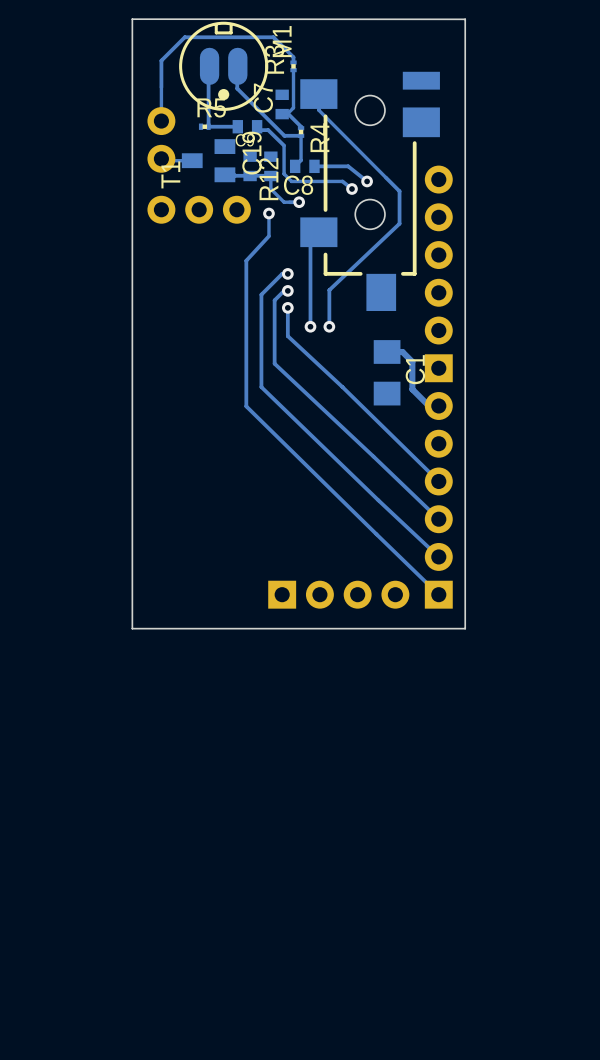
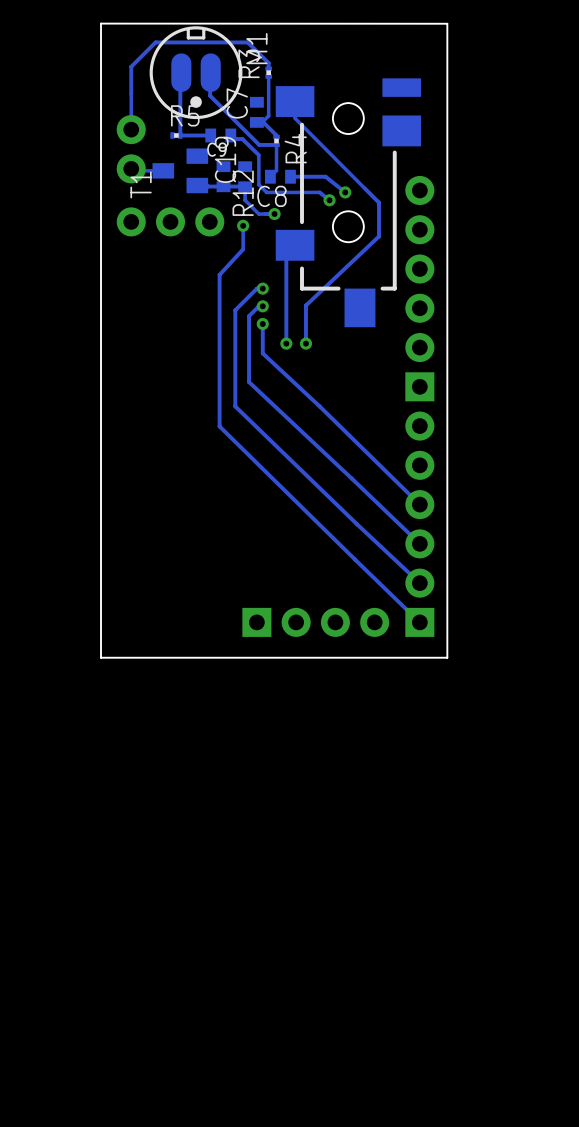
track: (387, 351) (402, 351) (412, 361) (412, 389) (429, 406) (438, 405) -> none
C1: (387, 372) -> none

